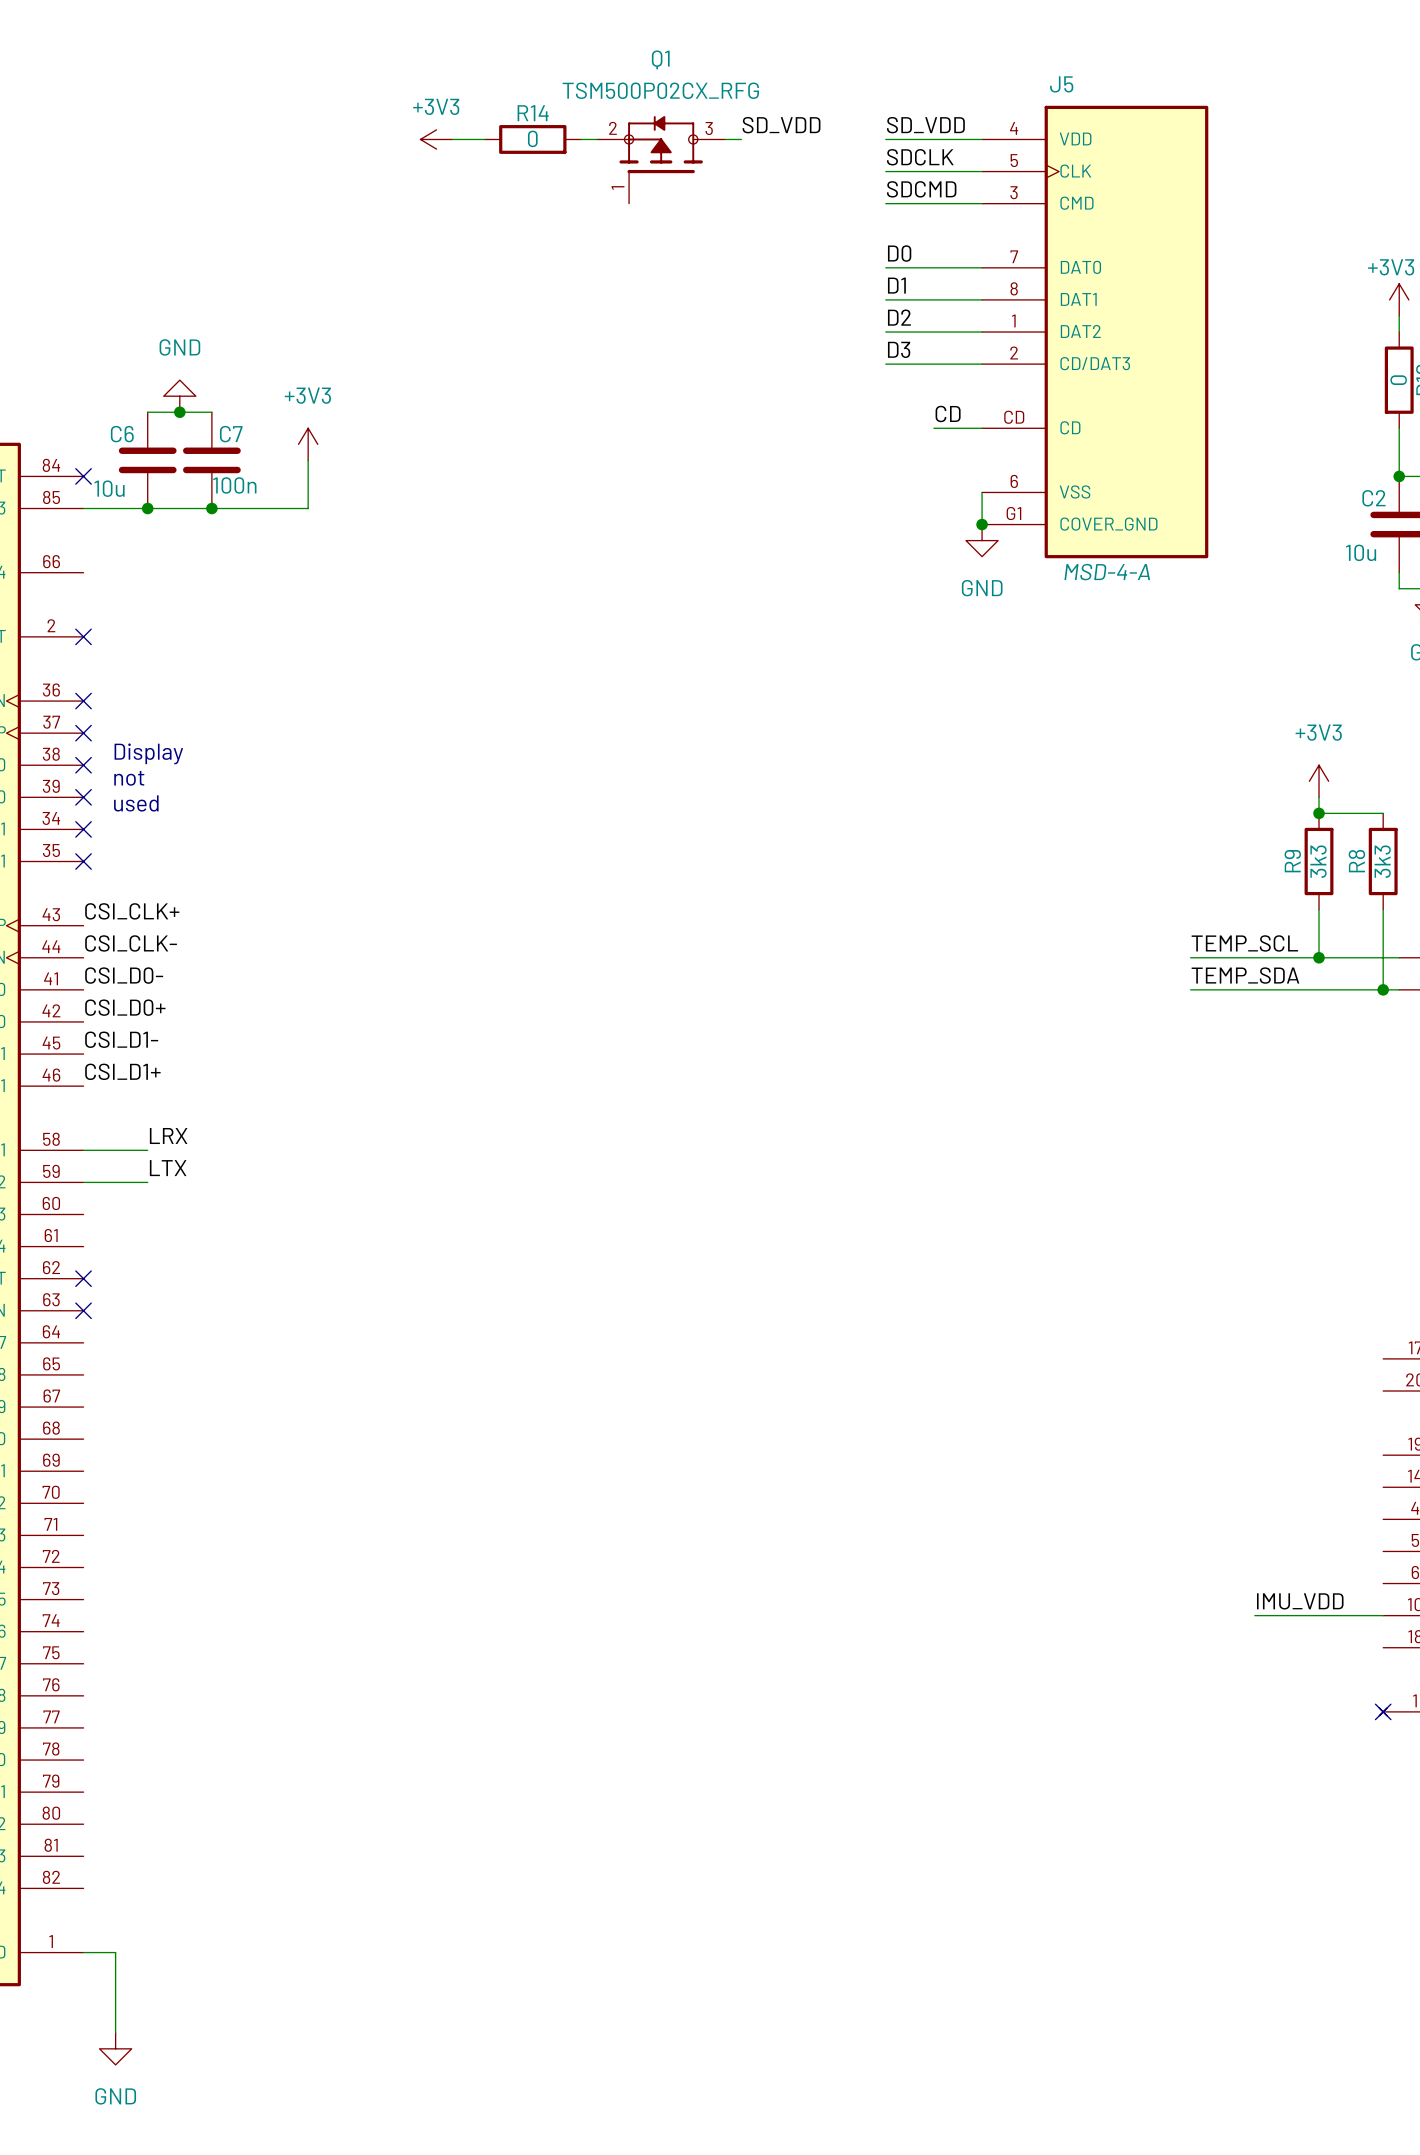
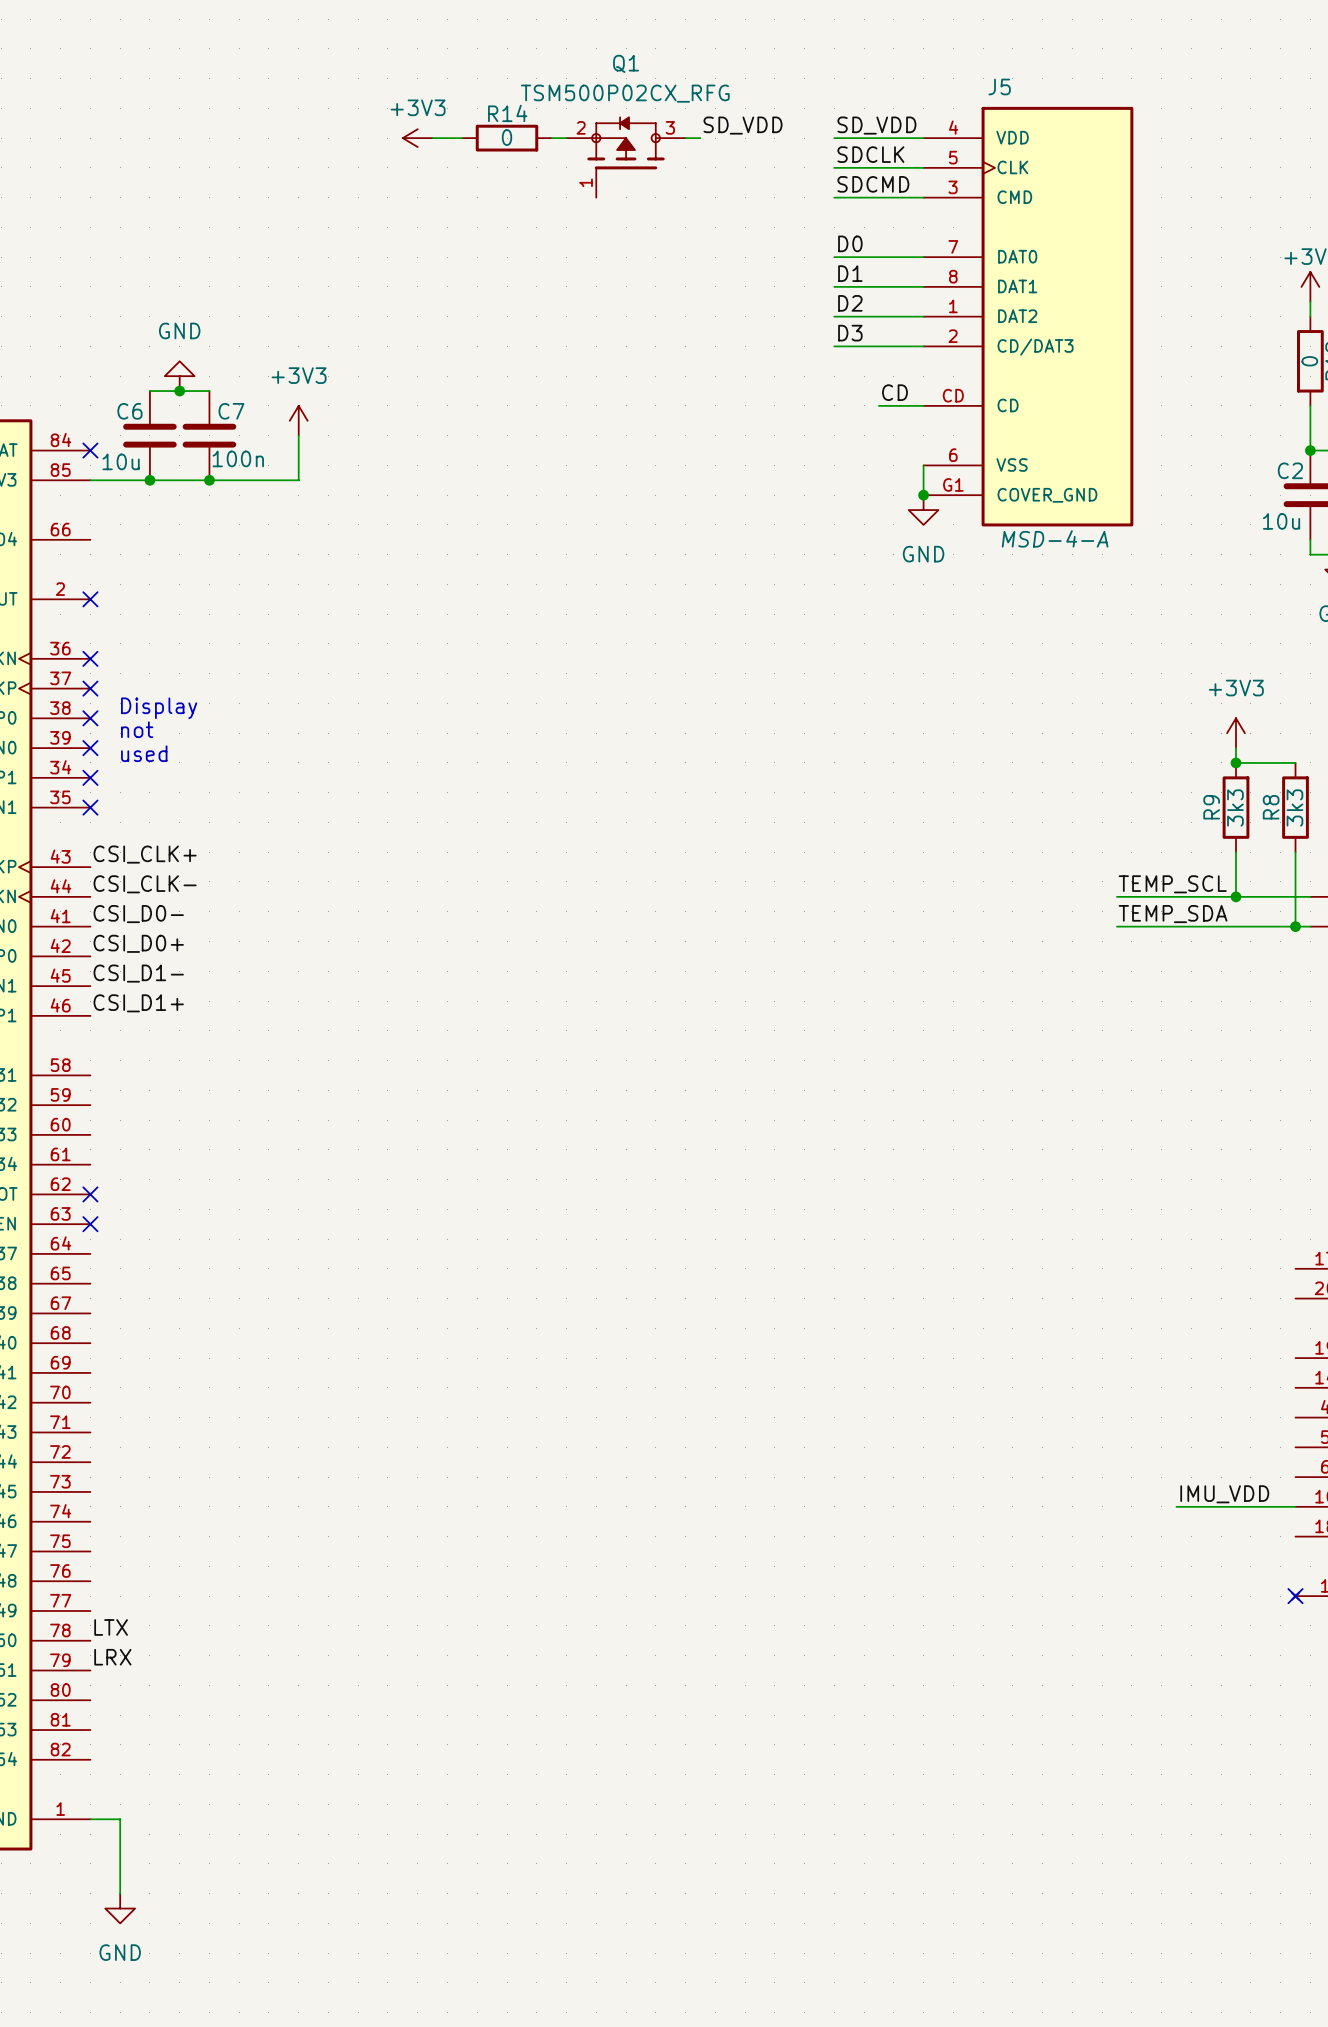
label: LRX (168, 1136) -> none
wire: (83, 1150) (147, 1150) -> none
label: LTX (168, 1168) -> none
wire: (83, 1182) (147, 1182) -> none
label: none -> LTX (111, 1627)
label: none -> LRX (112, 1657)

